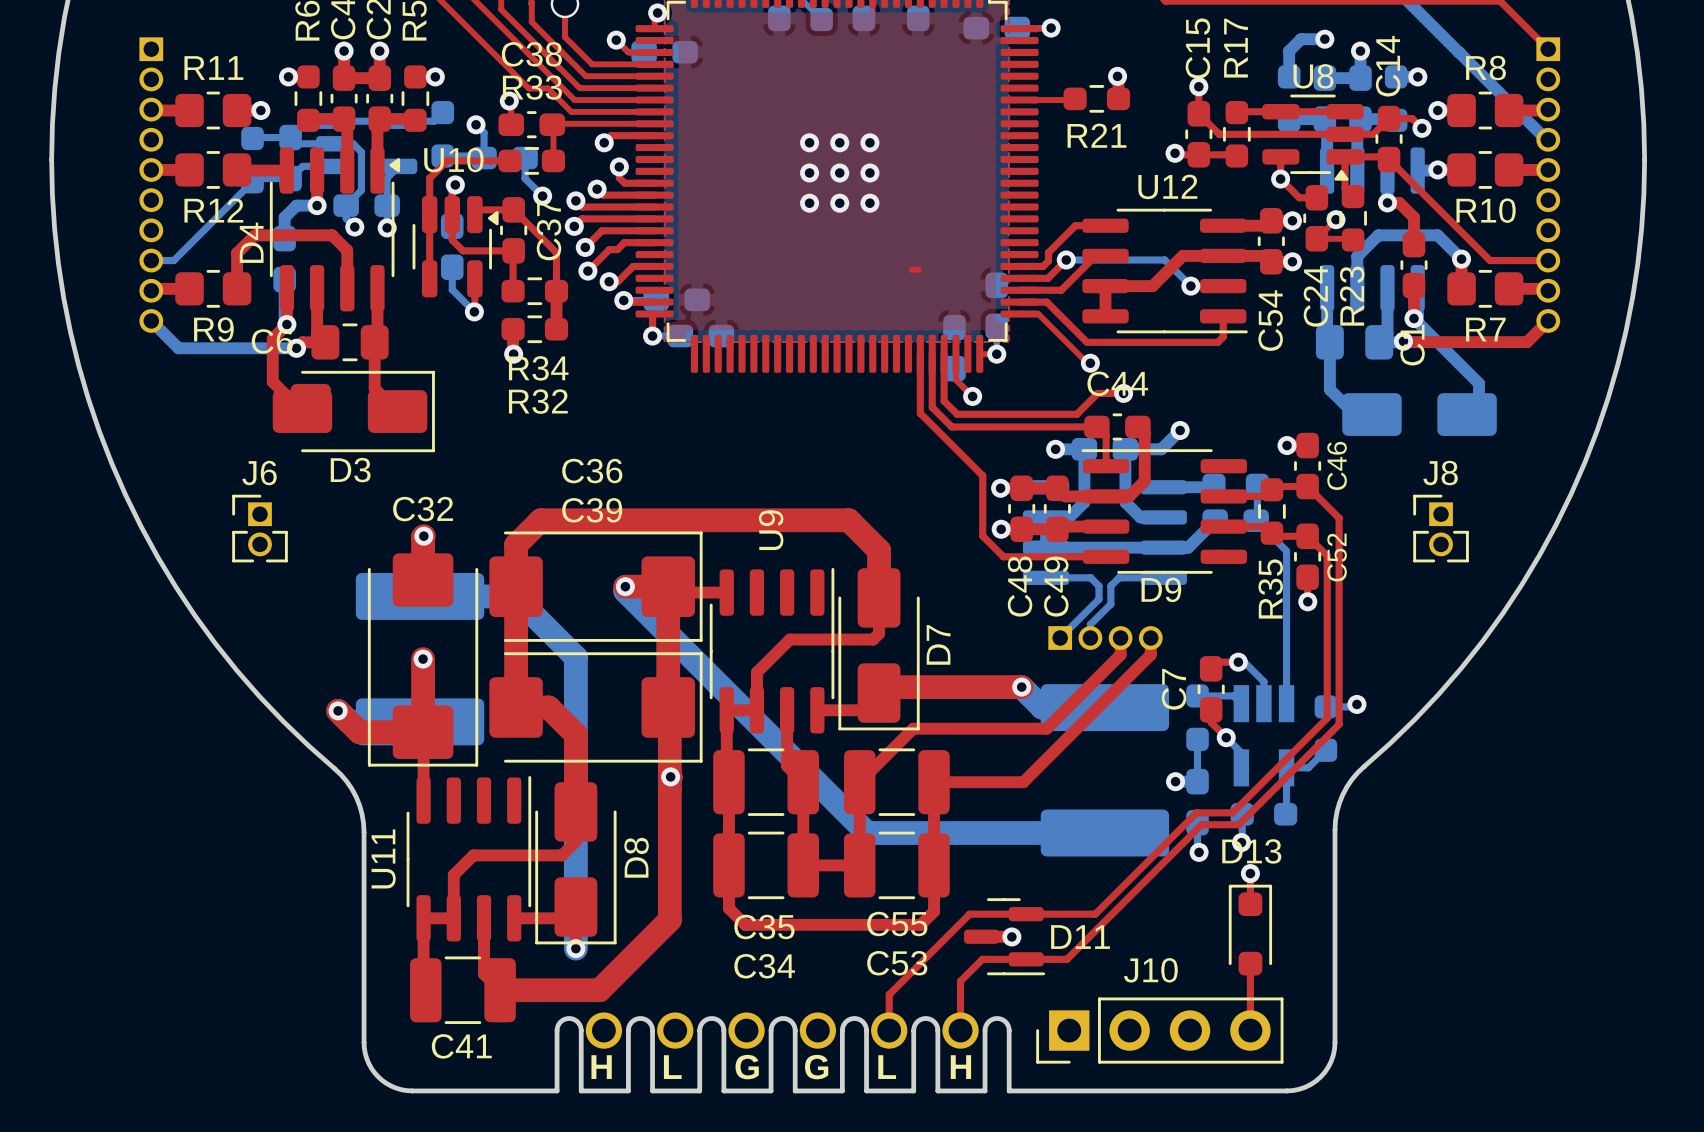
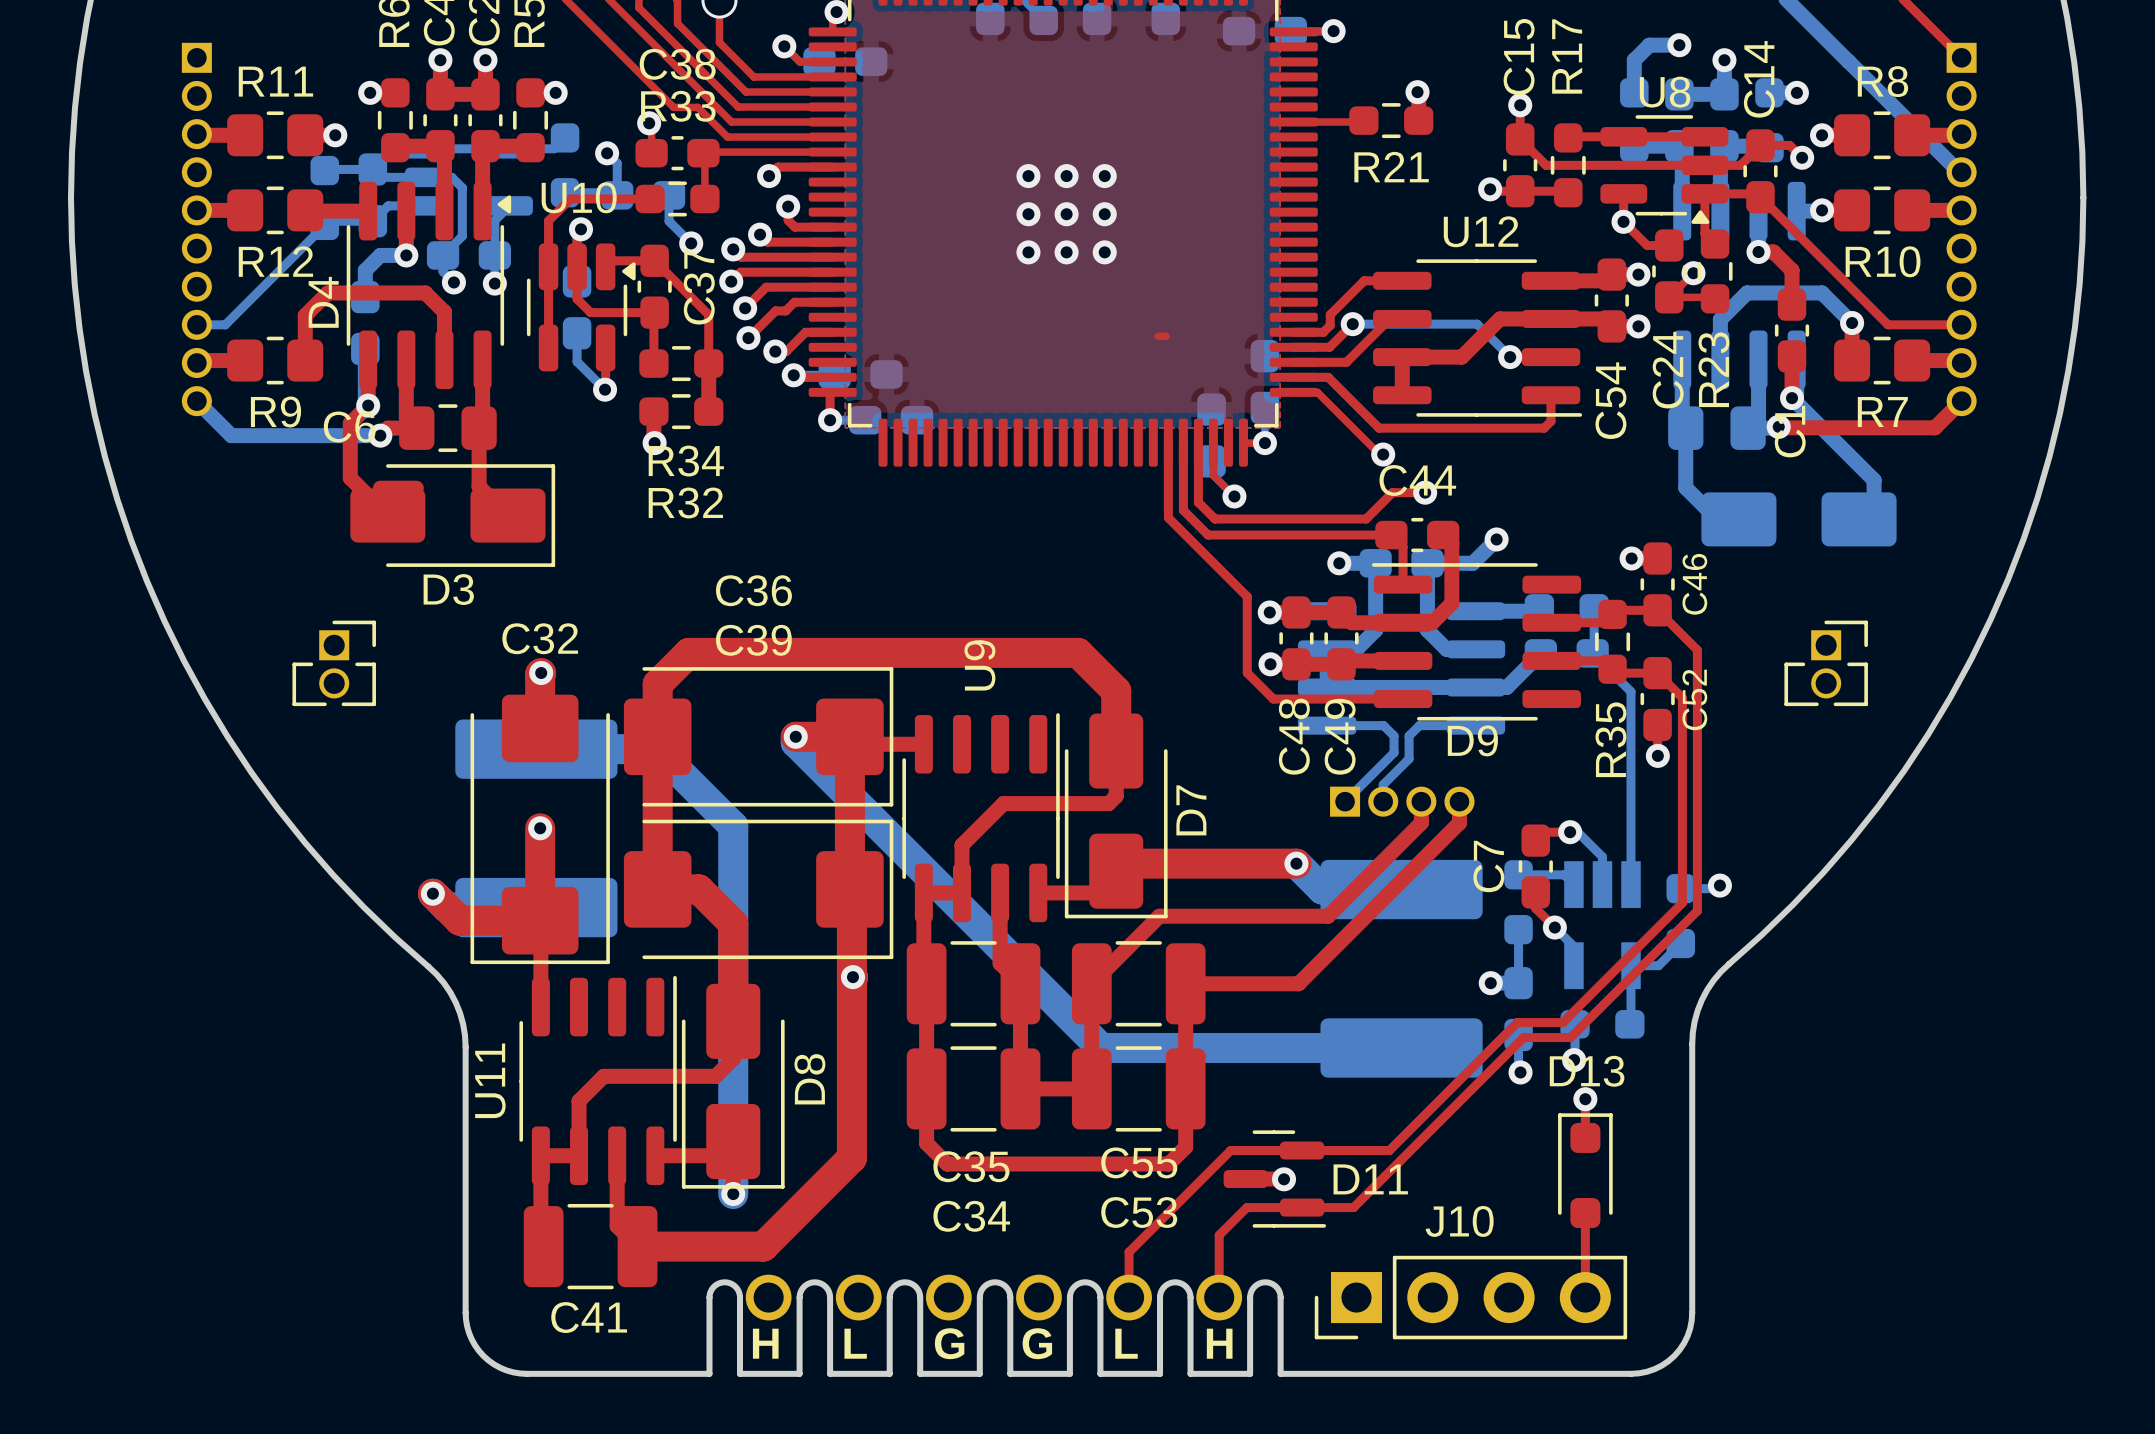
J6: (260, 528) -> none
part: none -> (334, 663)
J8: (1441, 528) -> none
part: none -> (1826, 663)

